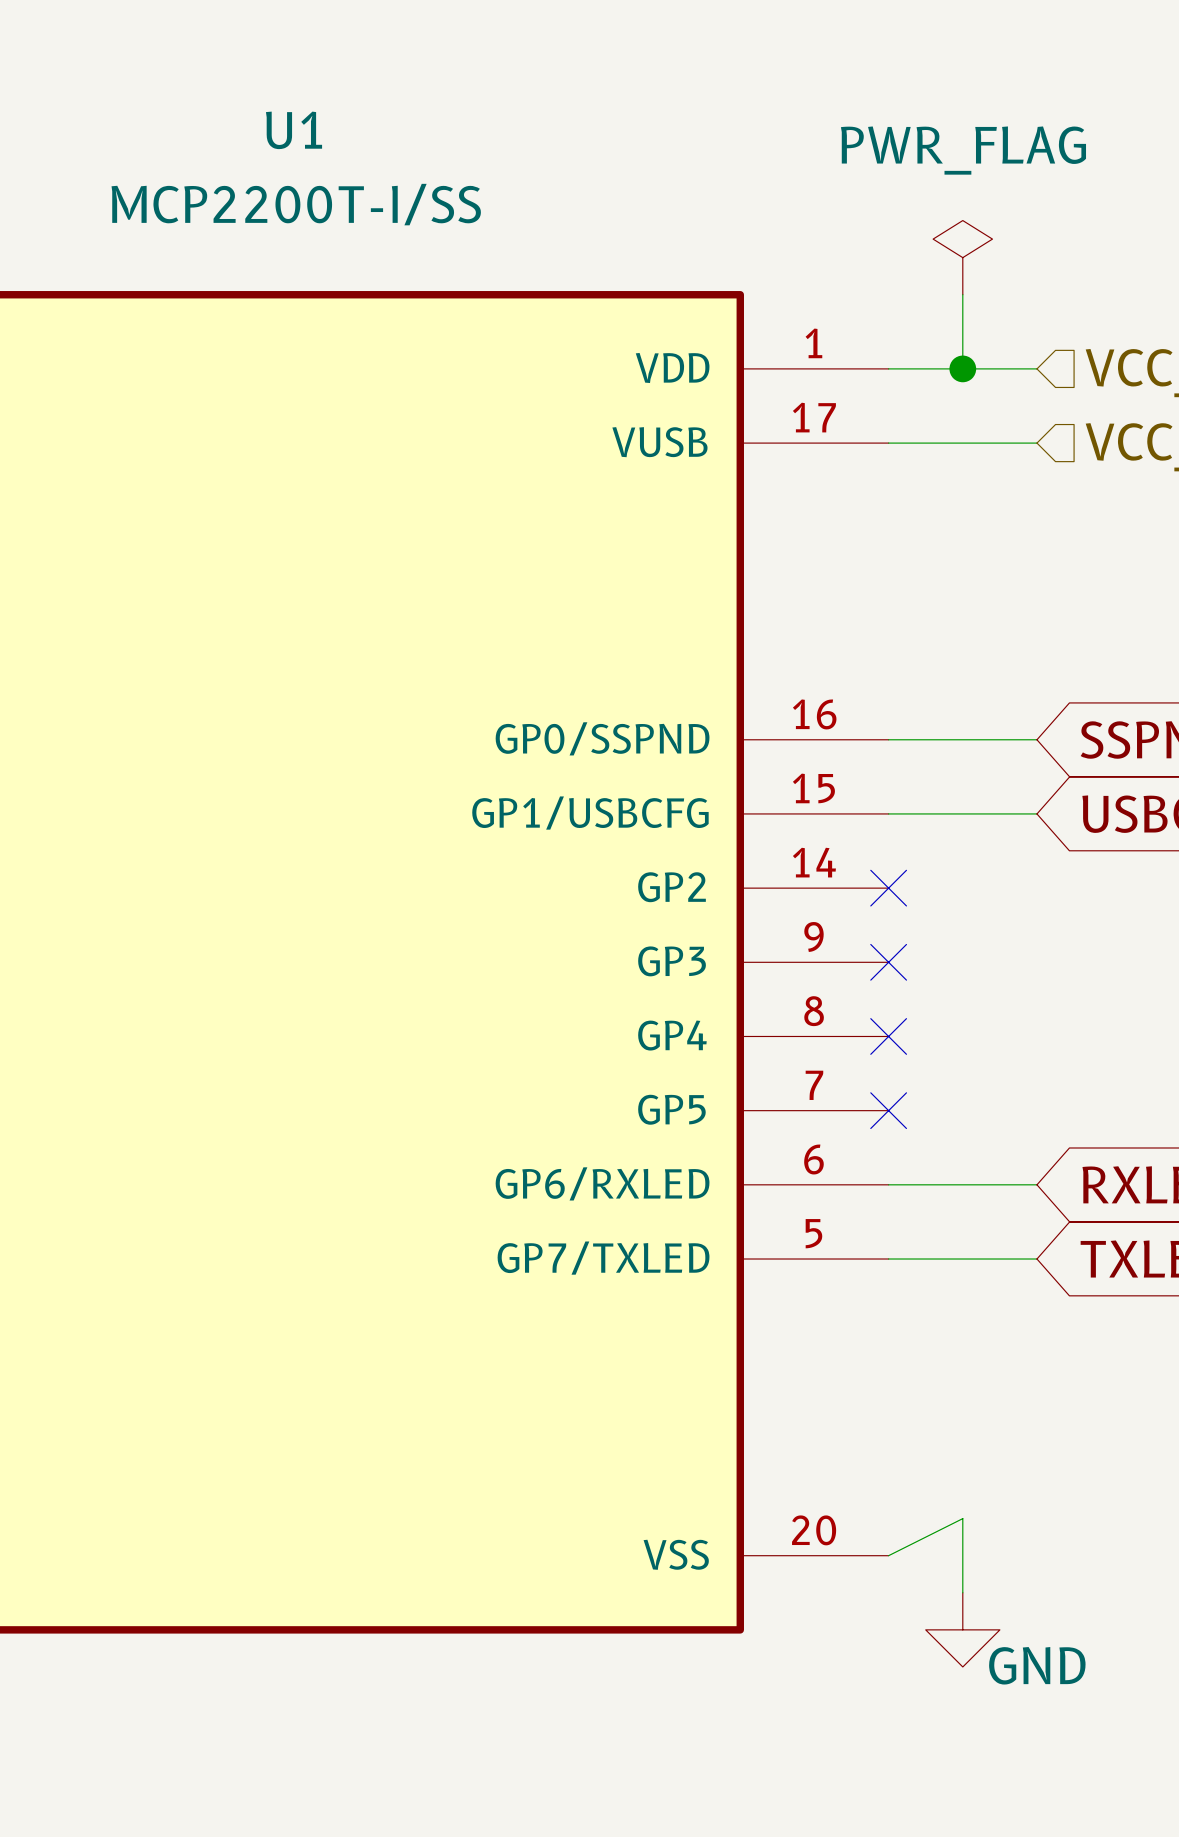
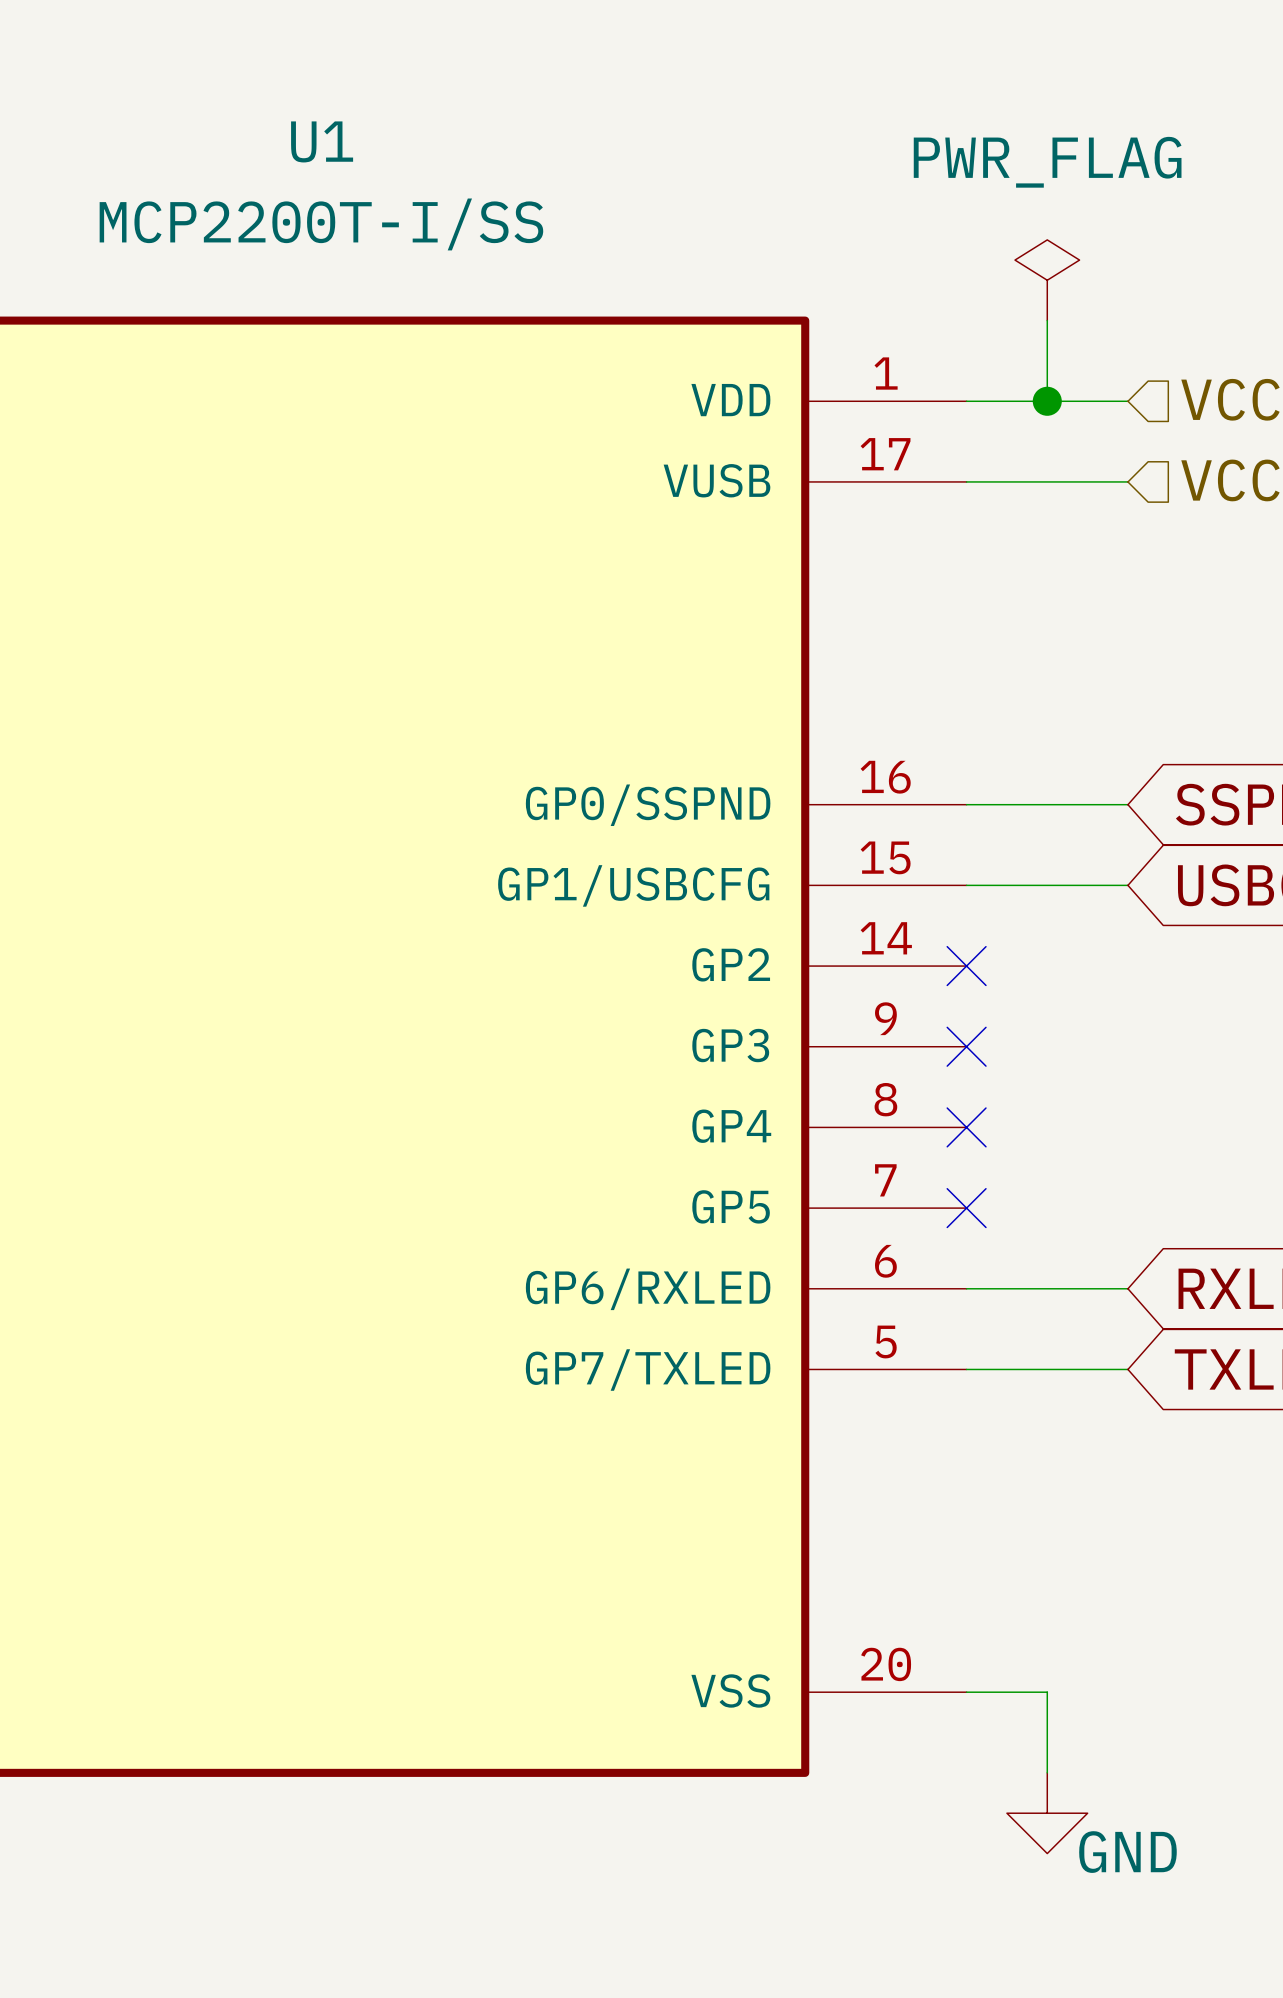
wire: (888, 1555) (962, 1518) (962, 1555) -> (966, 1692) (1047, 1692)
power symbol position: GND (962, 1629) -> GND (1047, 1813)

